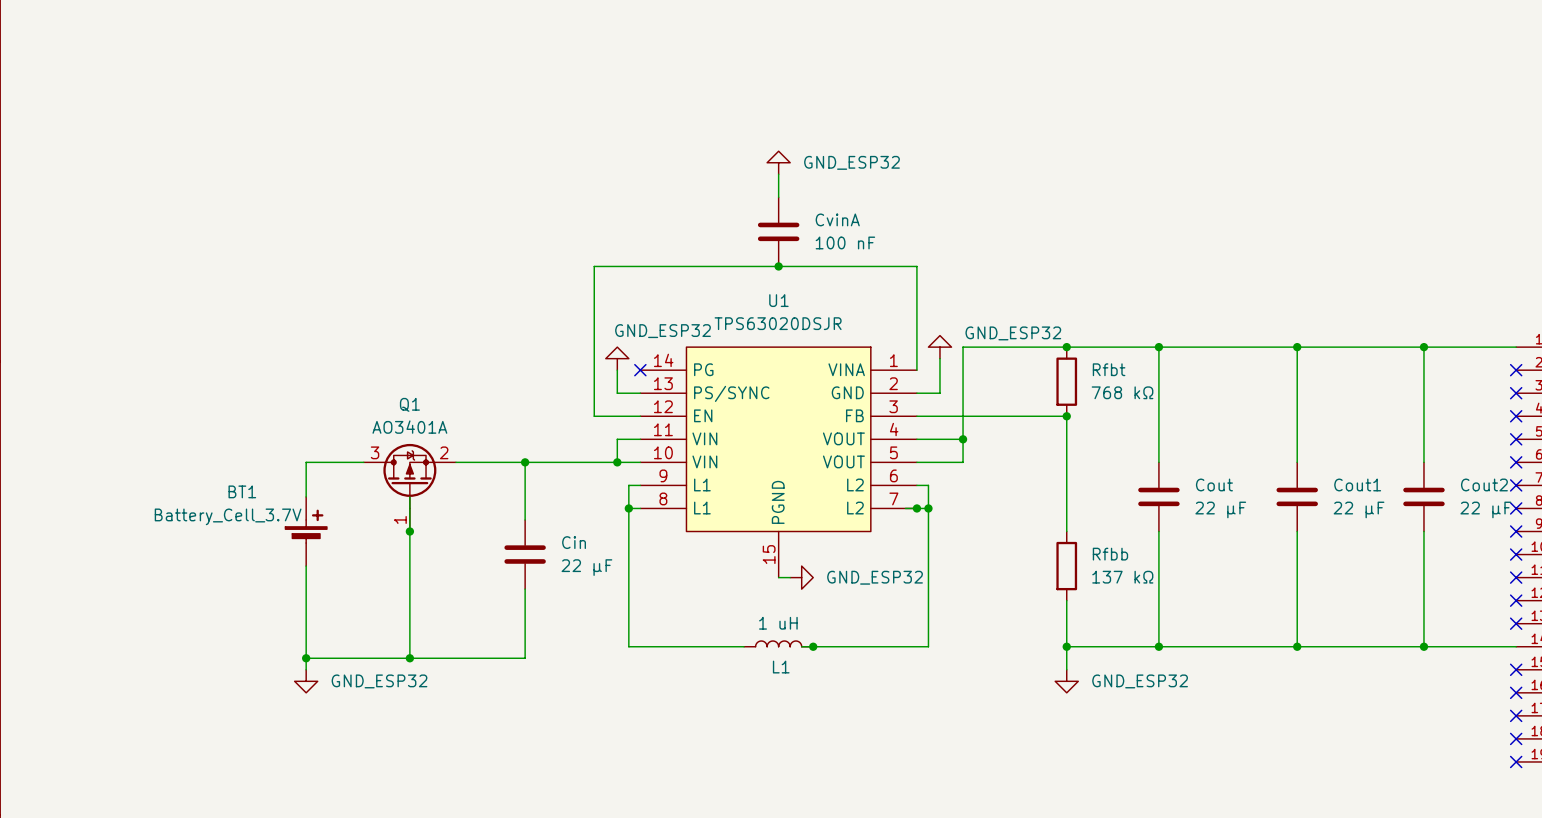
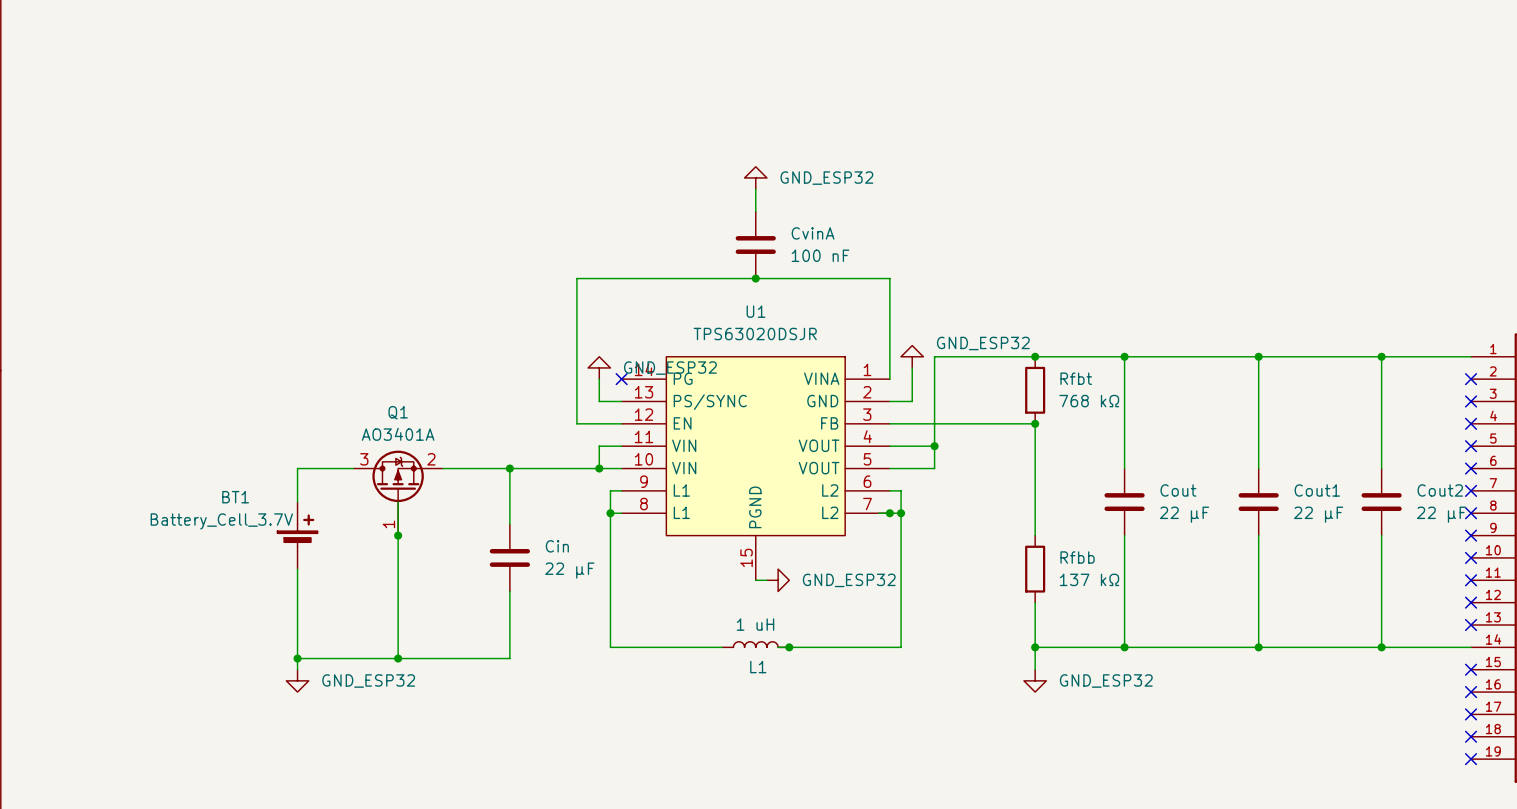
power symbol text position: GND_ESP32 (663, 331) -> GND_ESP32 (670, 368)

